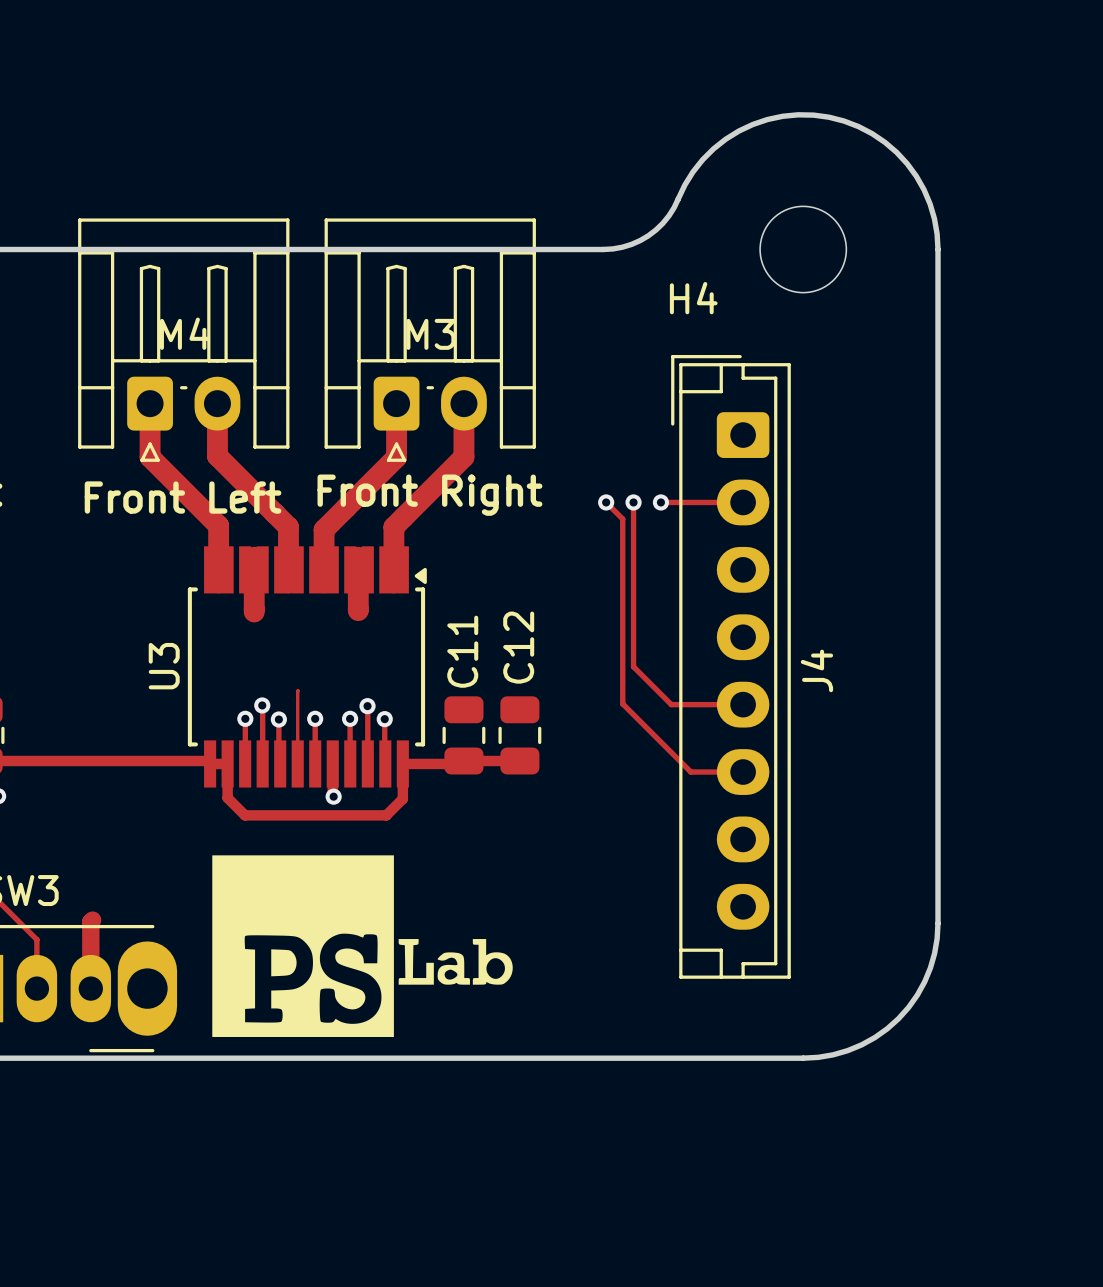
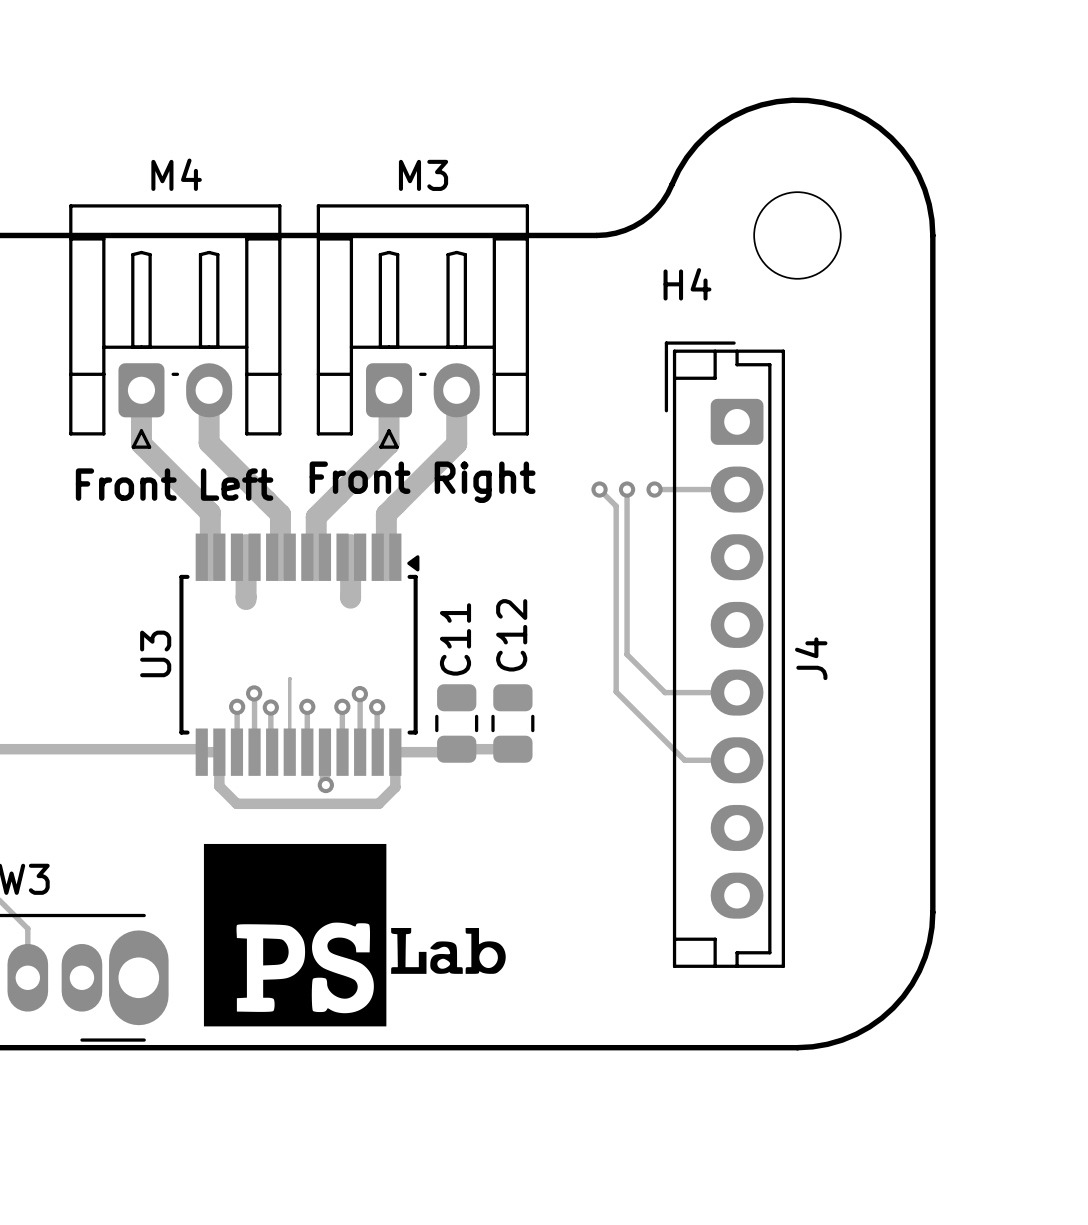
M4 name position: M4 (185, 333) -> M4 (176, 174)
M3 name position: M3 (430, 334) -> M3 (423, 175)
track: (92, 920) (90, 921) (90, 988) -> none

